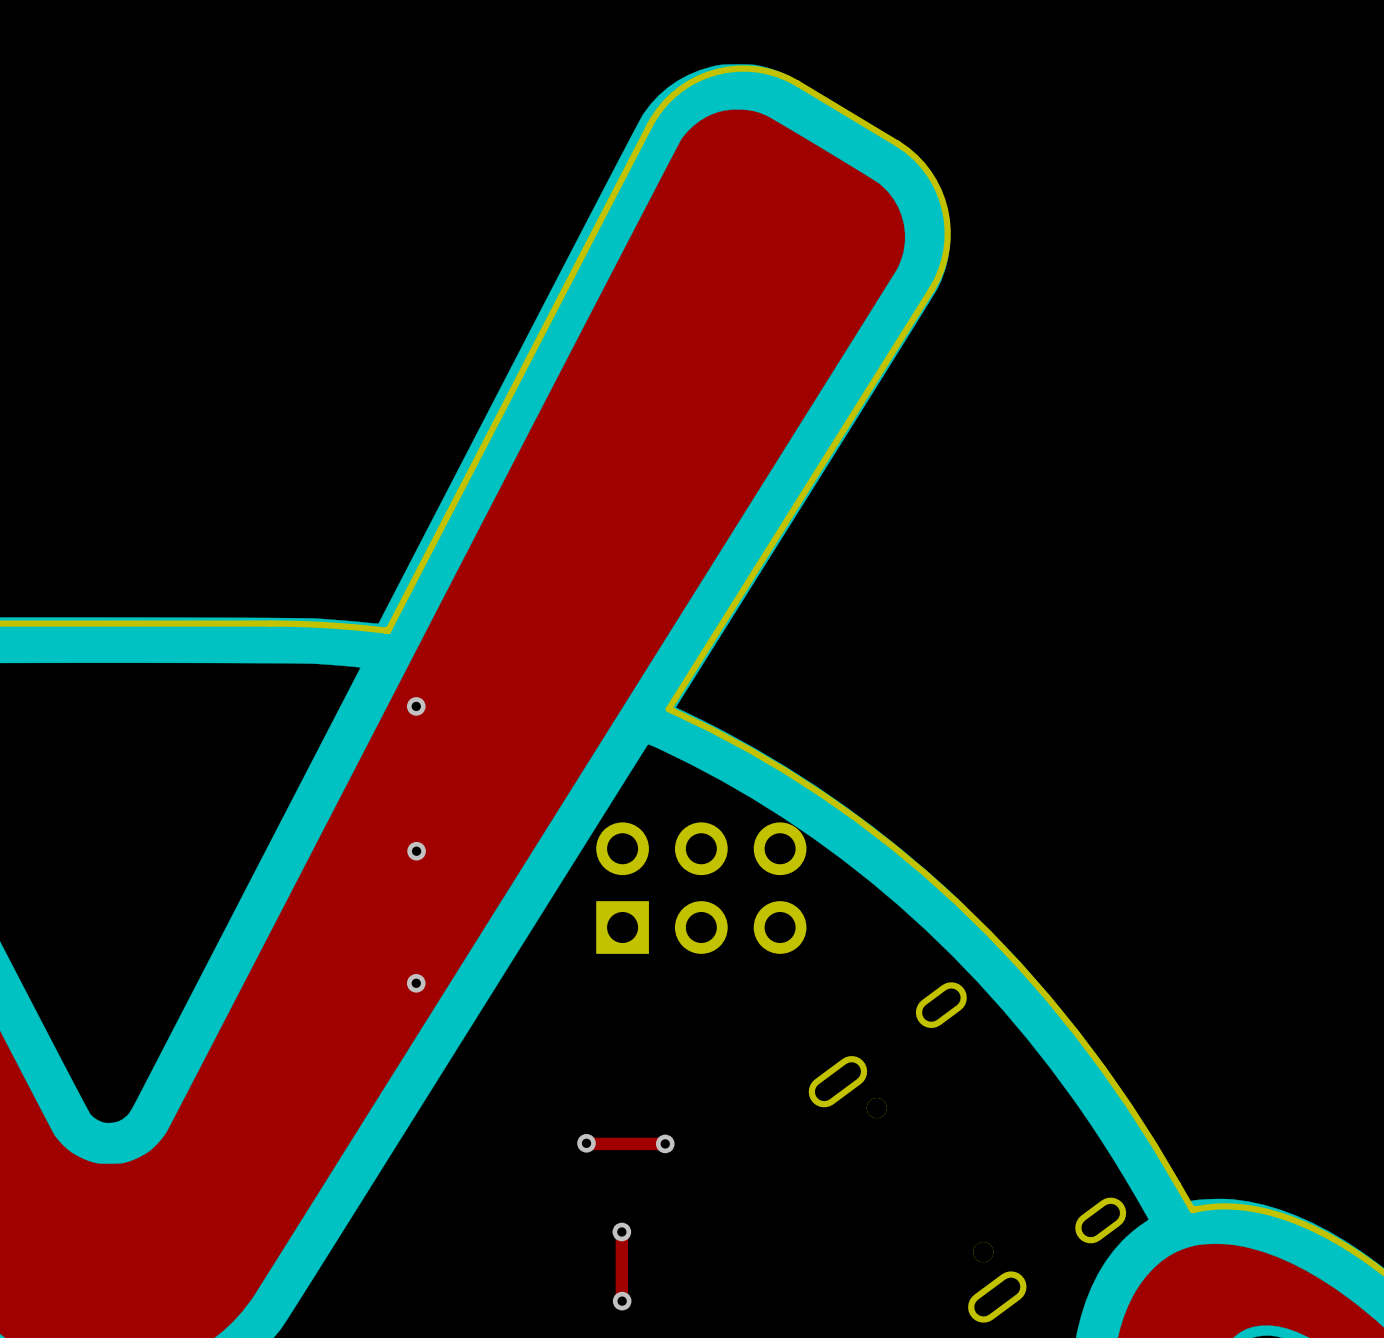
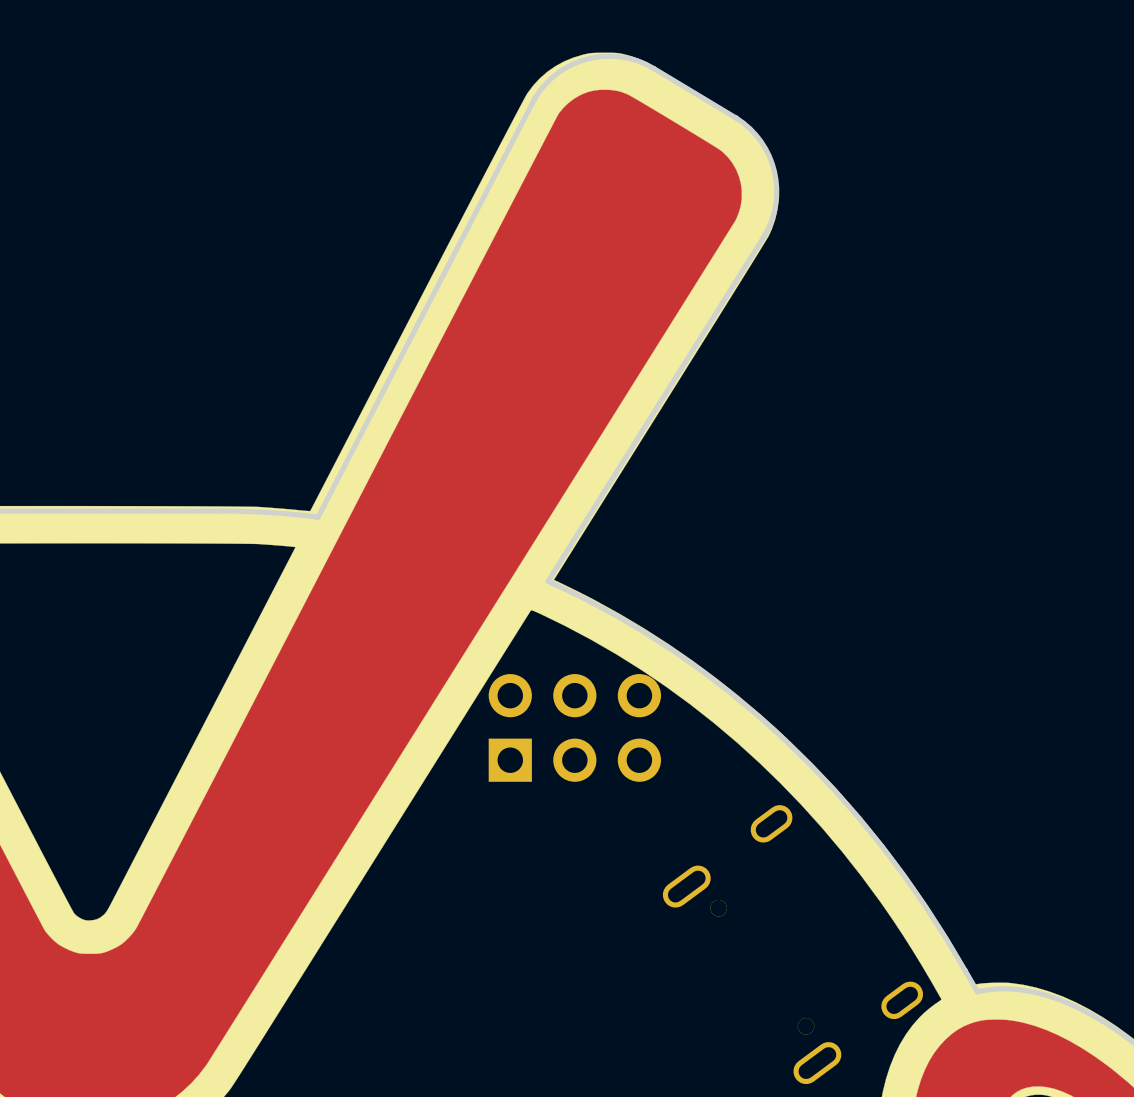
via: (416, 706) -> none
via: (416, 851) -> none
via: (416, 983) -> none
track: (586, 1143) (665, 1143) -> none
via: (586, 1143) -> none
via: (665, 1143) -> none
track: (621, 1231) (621, 1300) -> none
via: (621, 1231) -> none
via: (622, 1301) -> none

